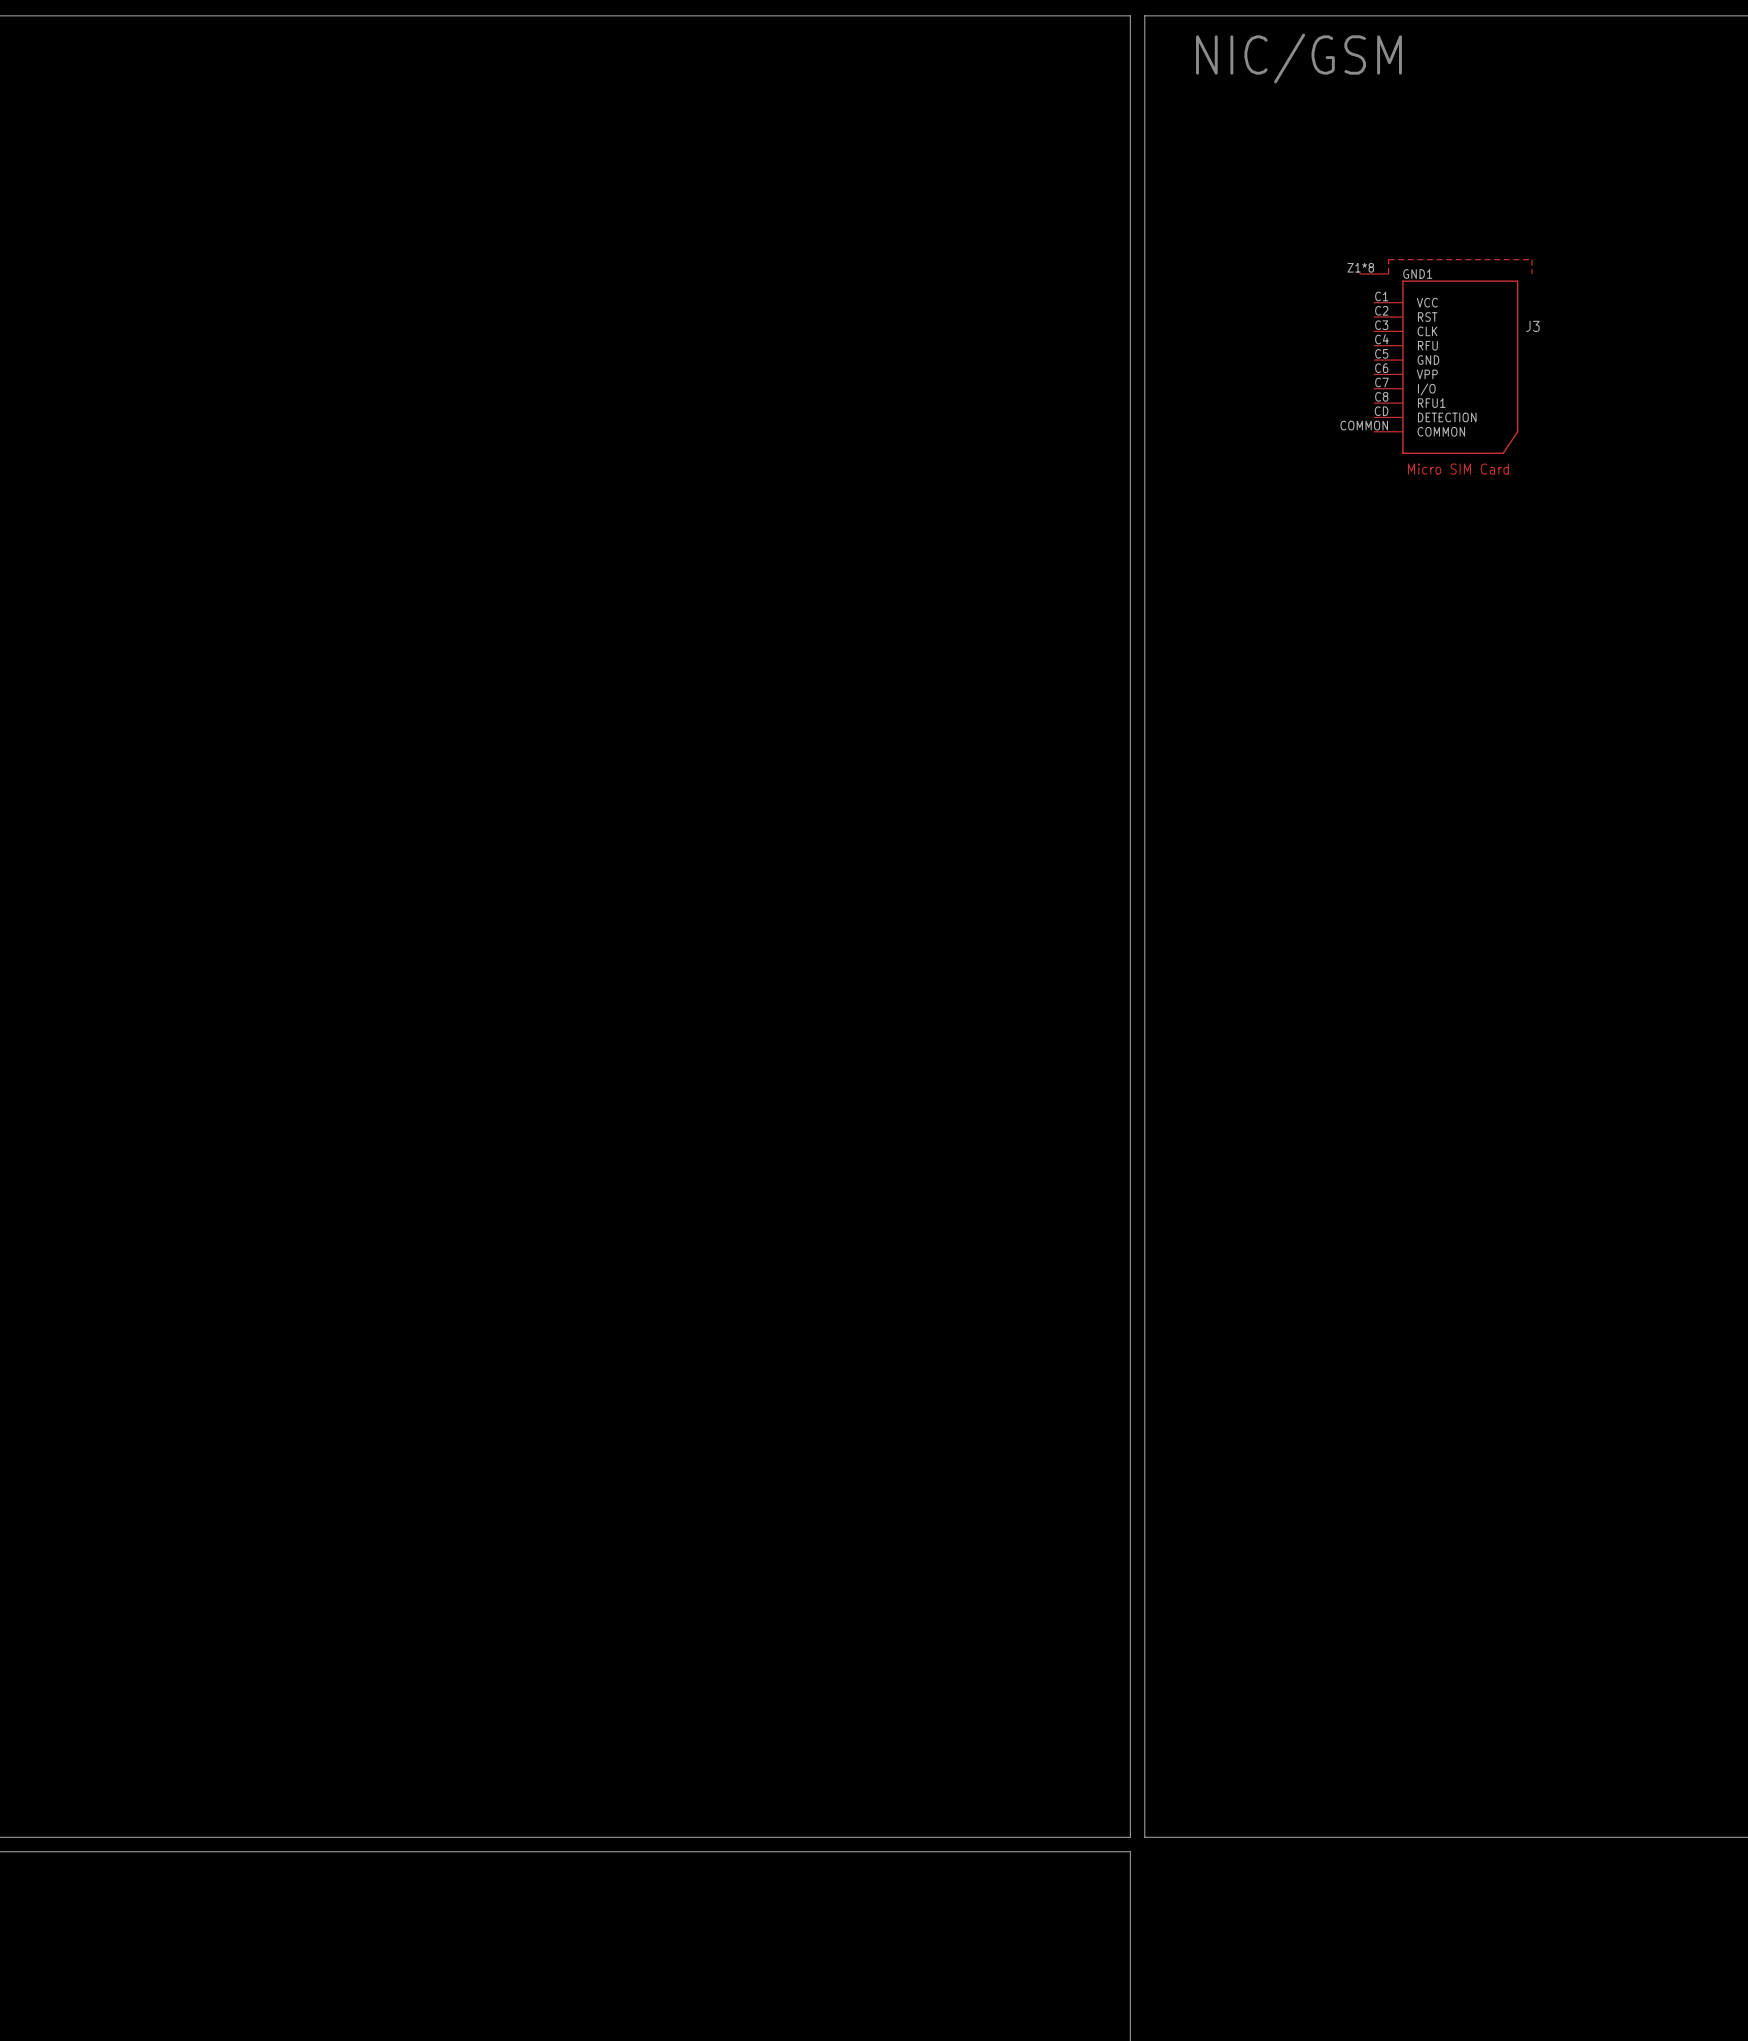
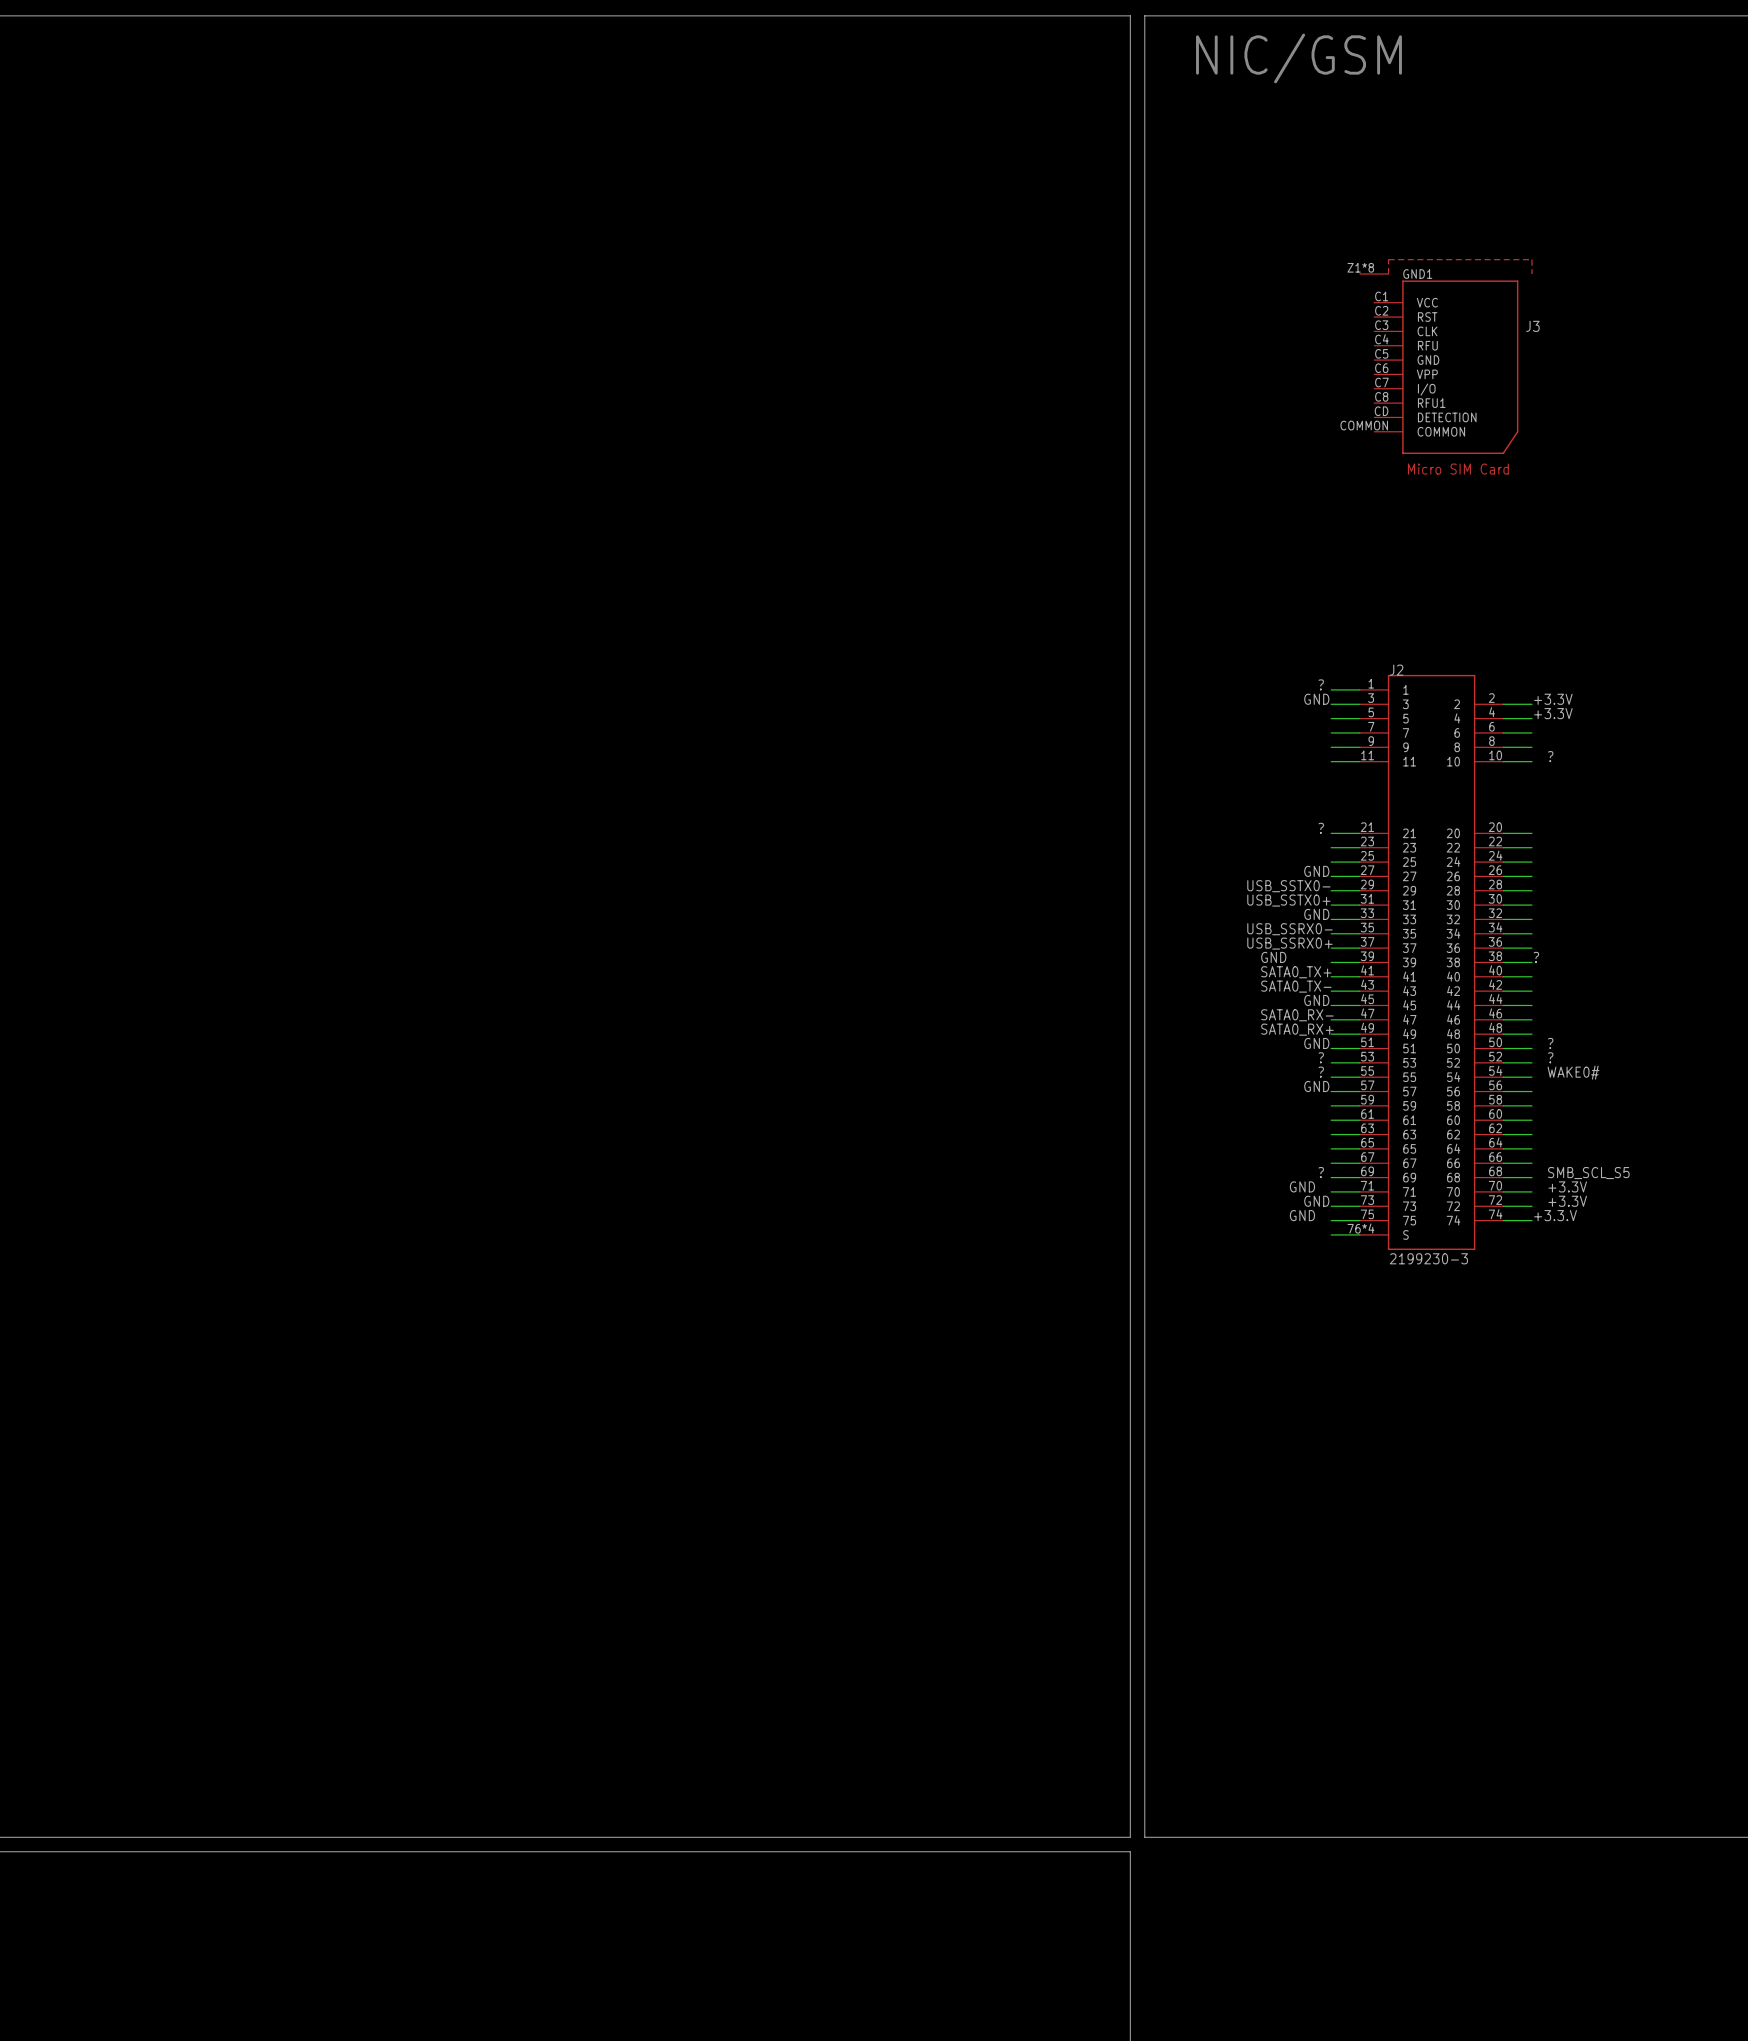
label: none -> ? (1321, 684)
wire: none -> (1331, 689) (1359, 689)
label: none -> GND (1316, 699)
label: none -> +3.3V (1553, 699)
wire: none -> (1331, 704) (1359, 704)
wire: none -> (1503, 704) (1531, 704)
label: none -> +3.3V (1553, 713)
wire: none -> (1331, 718) (1359, 718)
wire: none -> (1503, 718) (1531, 718)
wire: none -> (1331, 732) (1359, 732)
wire: none -> (1503, 732) (1531, 732)
wire: none -> (1331, 747) (1359, 747)
wire: none -> (1503, 747) (1531, 747)
label: none -> ? (1550, 756)
wire: none -> (1331, 761) (1359, 761)
wire: none -> (1503, 761) (1531, 761)
label: none -> ? (1321, 828)
wire: none -> (1331, 833) (1359, 833)
wire: none -> (1503, 833) (1531, 833)
wire: none -> (1331, 847) (1359, 847)
wire: none -> (1503, 847) (1531, 847)
wire: none -> (1331, 862) (1359, 862)
wire: none -> (1503, 862) (1531, 862)
label: none -> GND (1316, 871)
wire: none -> (1331, 876) (1359, 876)
wire: none -> (1503, 876) (1531, 876)
label: none -> USB_SSTX0- (1288, 886)
wire: none -> (1331, 890) (1359, 890)
wire: none -> (1503, 890) (1531, 890)
label: none -> USB_SSTX0+ (1288, 900)
wire: none -> (1331, 905) (1359, 905)
wire: none -> (1503, 905) (1531, 905)
label: none -> GND (1316, 914)
wire: none -> (1331, 919) (1359, 919)
wire: none -> (1503, 919) (1531, 919)
label: none -> USB_SSRX0- (1289, 929)
wire: none -> (1331, 933) (1359, 933)
wire: none -> (1503, 933) (1531, 933)
label: none -> USB_SSRX0+ (1289, 943)
wire: none -> (1331, 948) (1359, 948)
wire: none -> (1503, 948) (1531, 948)
label: none -> GND (1273, 957)
label: none -> ? (1536, 957)
wire: none -> (1331, 962) (1359, 962)
J2: none -> 2199230-3 (1431, 962)
wire: none -> (1503, 962) (1531, 962)
label: none -> SATA0_TX+ (1296, 972)
wire: none -> (1331, 976) (1359, 976)
wire: none -> (1503, 976) (1531, 976)
label: none -> SATA0_TX- (1296, 986)
wire: none -> (1331, 991) (1359, 991)
wire: none -> (1503, 991) (1531, 991)
label: none -> GND (1316, 1000)
wire: none -> (1331, 1005) (1359, 1005)
wire: none -> (1503, 1005) (1531, 1005)
label: none -> SATA0_RX- (1297, 1015)
wire: none -> (1331, 1019) (1359, 1019)
wire: none -> (1503, 1019) (1531, 1019)
label: none -> SATA0_RX+ (1297, 1029)
wire: none -> (1331, 1034) (1359, 1034)
wire: none -> (1503, 1034) (1531, 1034)
label: none -> GND (1316, 1043)
label: none -> ? (1550, 1043)
wire: none -> (1331, 1048) (1359, 1048)
wire: none -> (1503, 1048) (1531, 1048)
label: none -> ? (1321, 1057)
label: none -> ? (1550, 1057)
wire: none -> (1331, 1062) (1359, 1062)
wire: none -> (1503, 1062) (1531, 1062)
label: none -> ? (1321, 1072)
label: none -> WAKE0# (1573, 1072)
wire: none -> (1331, 1077) (1359, 1077)
wire: none -> (1503, 1077) (1531, 1077)
label: none -> GND (1316, 1086)
wire: none -> (1331, 1091) (1359, 1091)
wire: none -> (1503, 1091) (1531, 1091)
wire: none -> (1331, 1105) (1359, 1105)
wire: none -> (1503, 1105) (1531, 1105)
wire: none -> (1331, 1120) (1359, 1120)
wire: none -> (1503, 1120) (1531, 1120)
wire: none -> (1331, 1134) (1359, 1134)
wire: none -> (1503, 1134) (1531, 1134)
wire: none -> (1331, 1148) (1359, 1148)
wire: none -> (1503, 1148) (1531, 1148)
wire: none -> (1331, 1163) (1359, 1163)
wire: none -> (1503, 1163) (1531, 1163)
label: none -> ? (1321, 1172)
label: none -> SMB_SCL_S5 (1588, 1173)
wire: none -> (1331, 1177) (1359, 1177)
wire: none -> (1503, 1177) (1531, 1177)
label: none -> GND (1302, 1186)
label: none -> +3.3V (1567, 1186)
wire: none -> (1331, 1191) (1359, 1191)
wire: none -> (1503, 1191) (1531, 1191)
label: none -> GND (1316, 1201)
label: none -> +3.3V (1567, 1201)
wire: none -> (1331, 1206) (1359, 1206)
wire: none -> (1503, 1206) (1531, 1206)
label: none -> GND (1302, 1215)
label: none -> +3.3.V (1555, 1215)
wire: none -> (1331, 1220) (1359, 1220)
wire: none -> (1503, 1220) (1531, 1220)
wire: none -> (1331, 1234) (1359, 1234)

